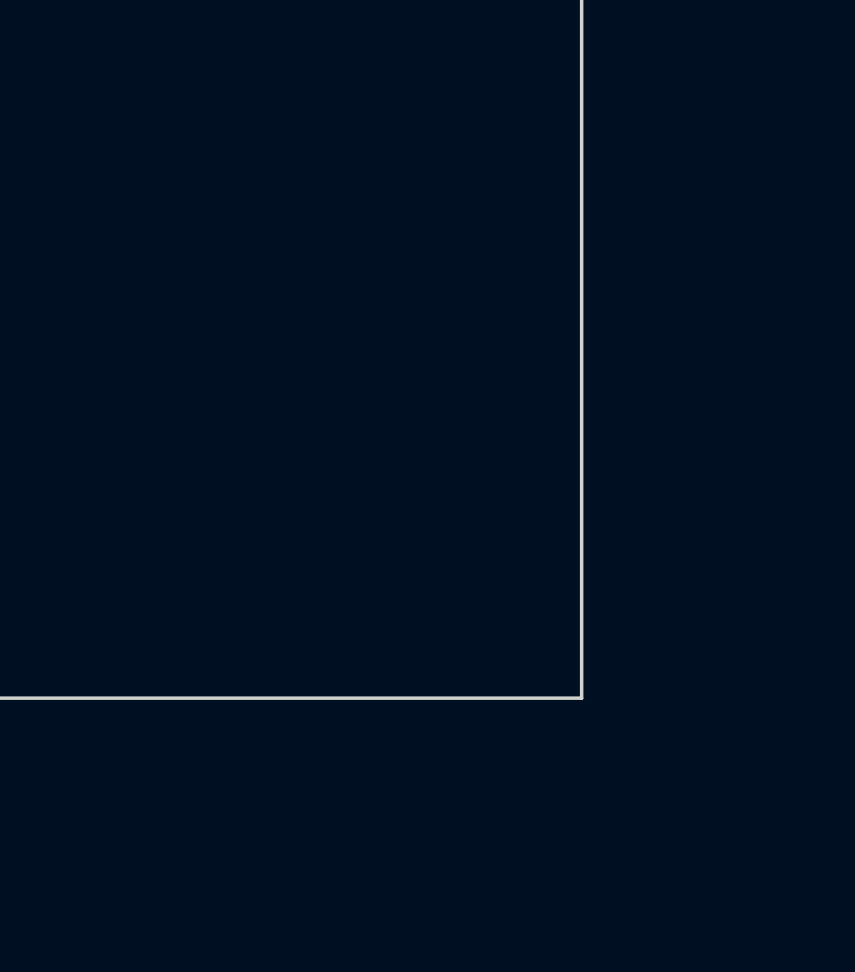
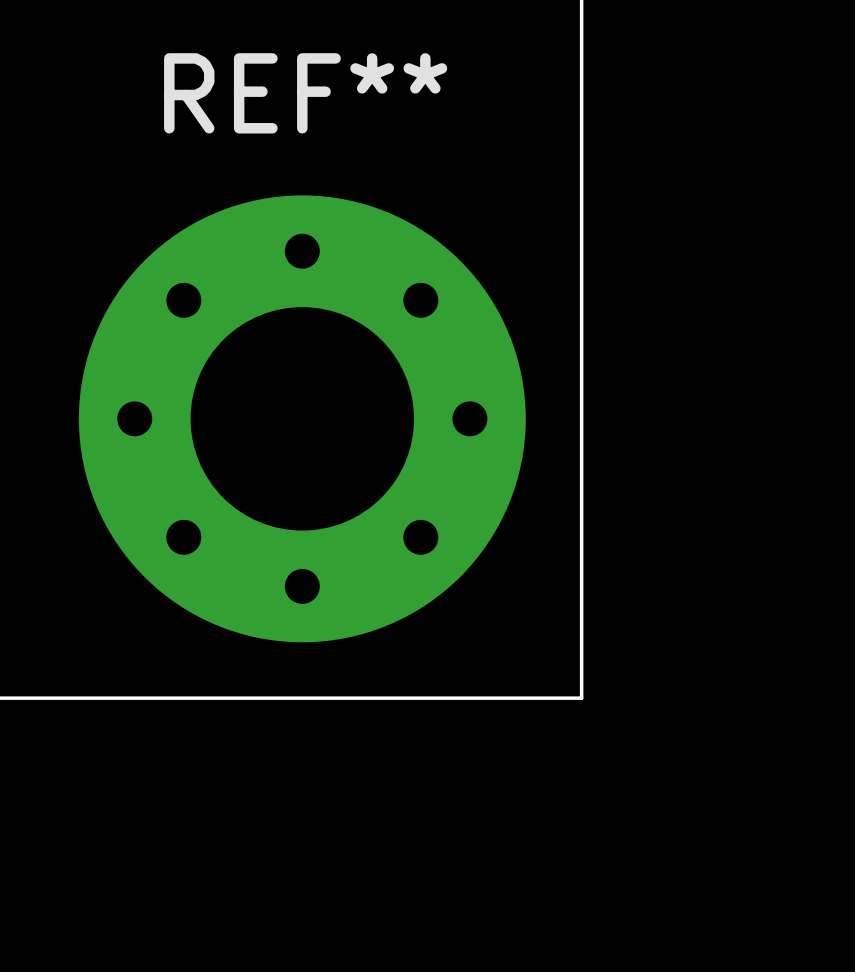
REF**: none -> (302, 418)

